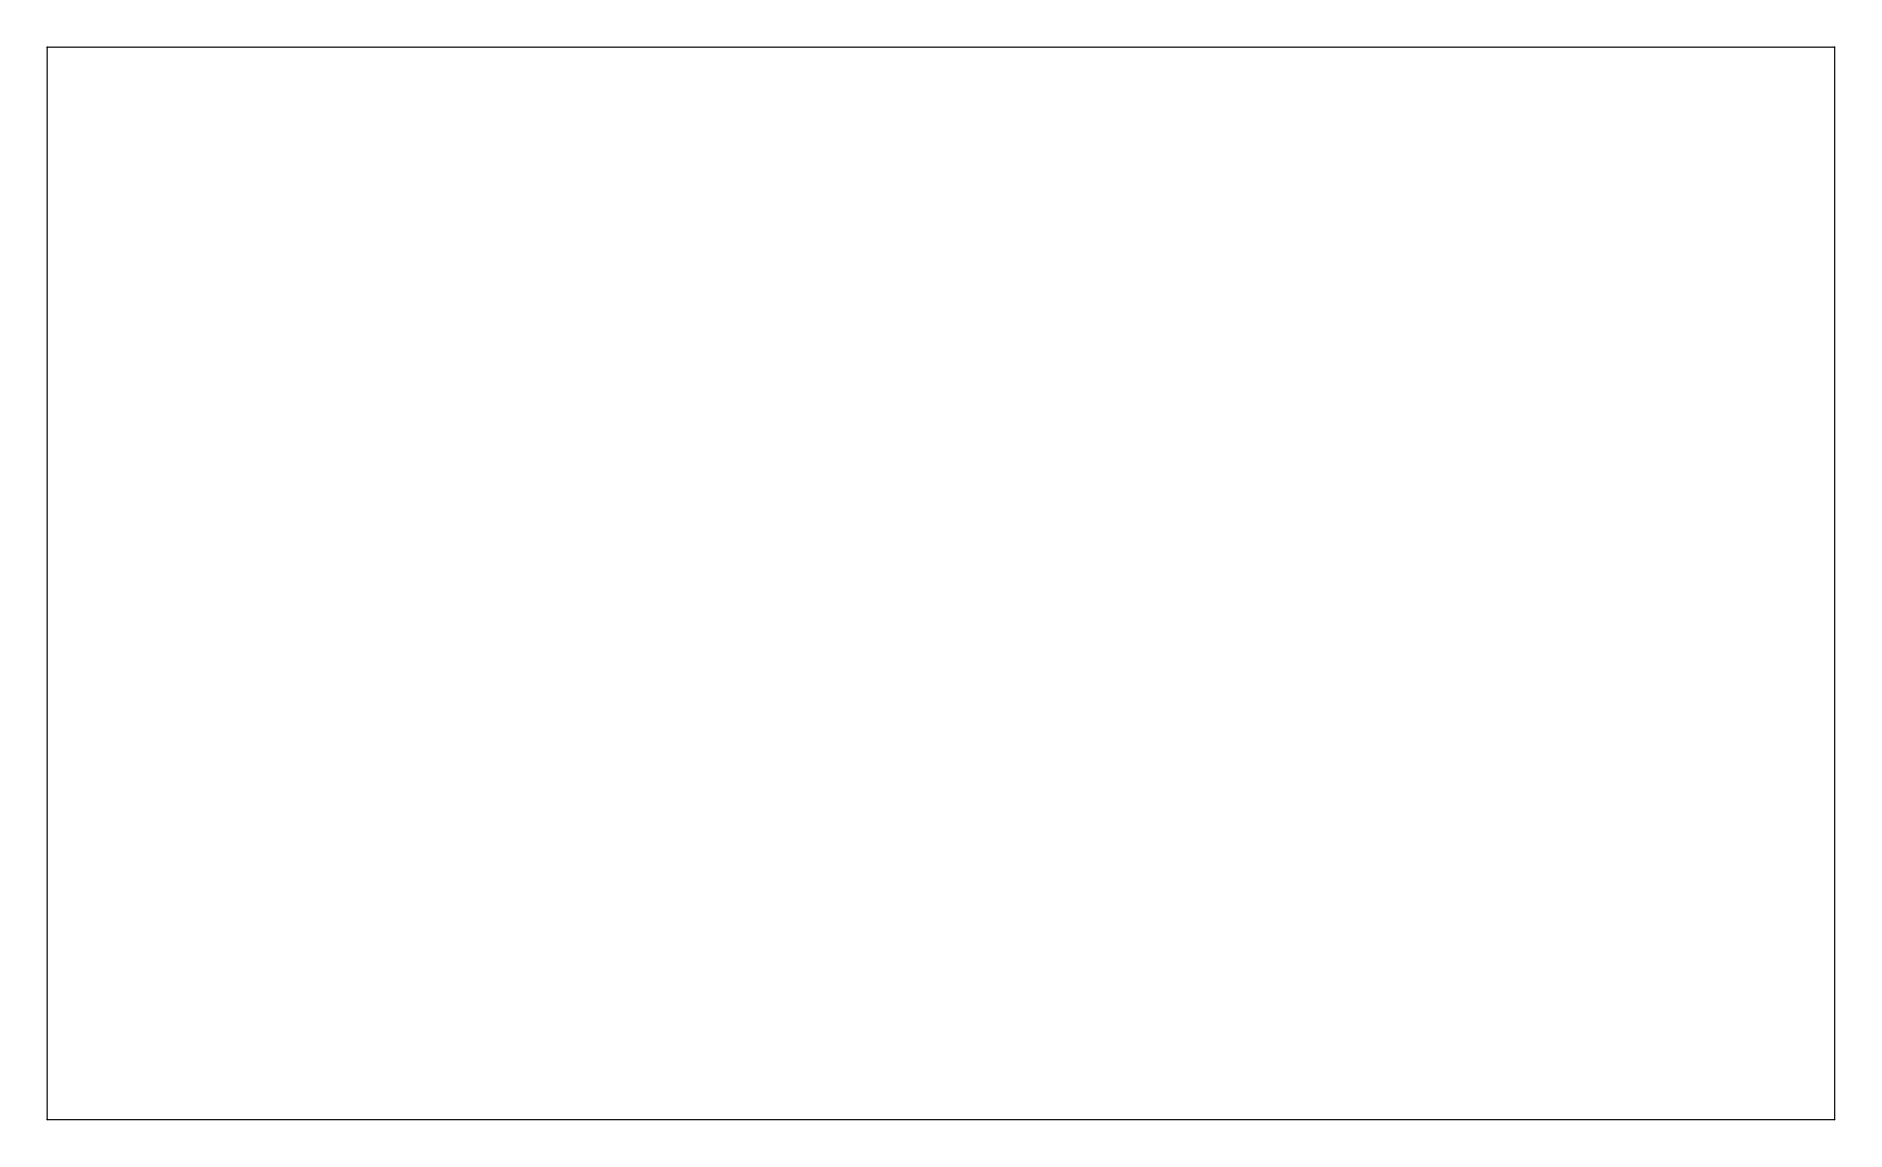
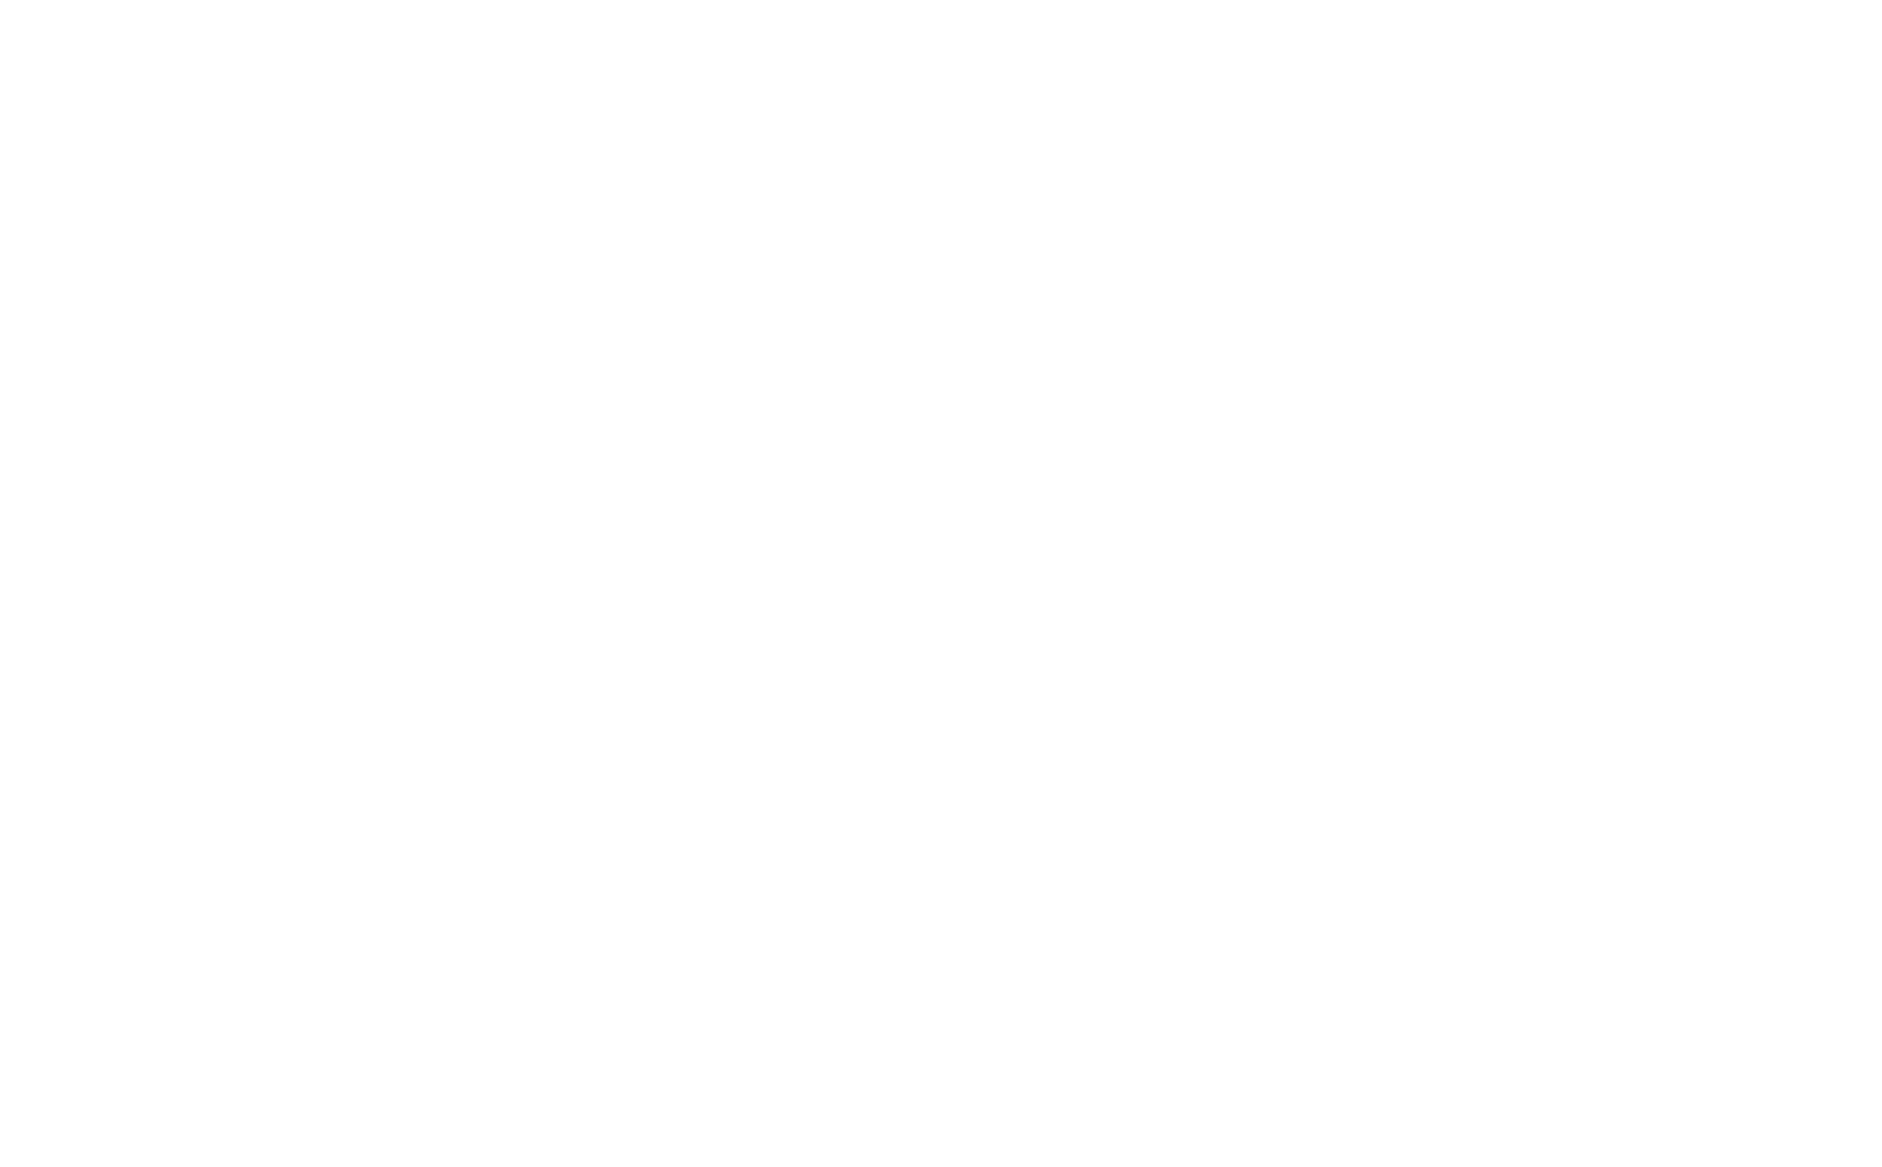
board edge: (1834, 47) (47, 47) (47, 1119) (1834, 1119) (1834, 47) -> none

